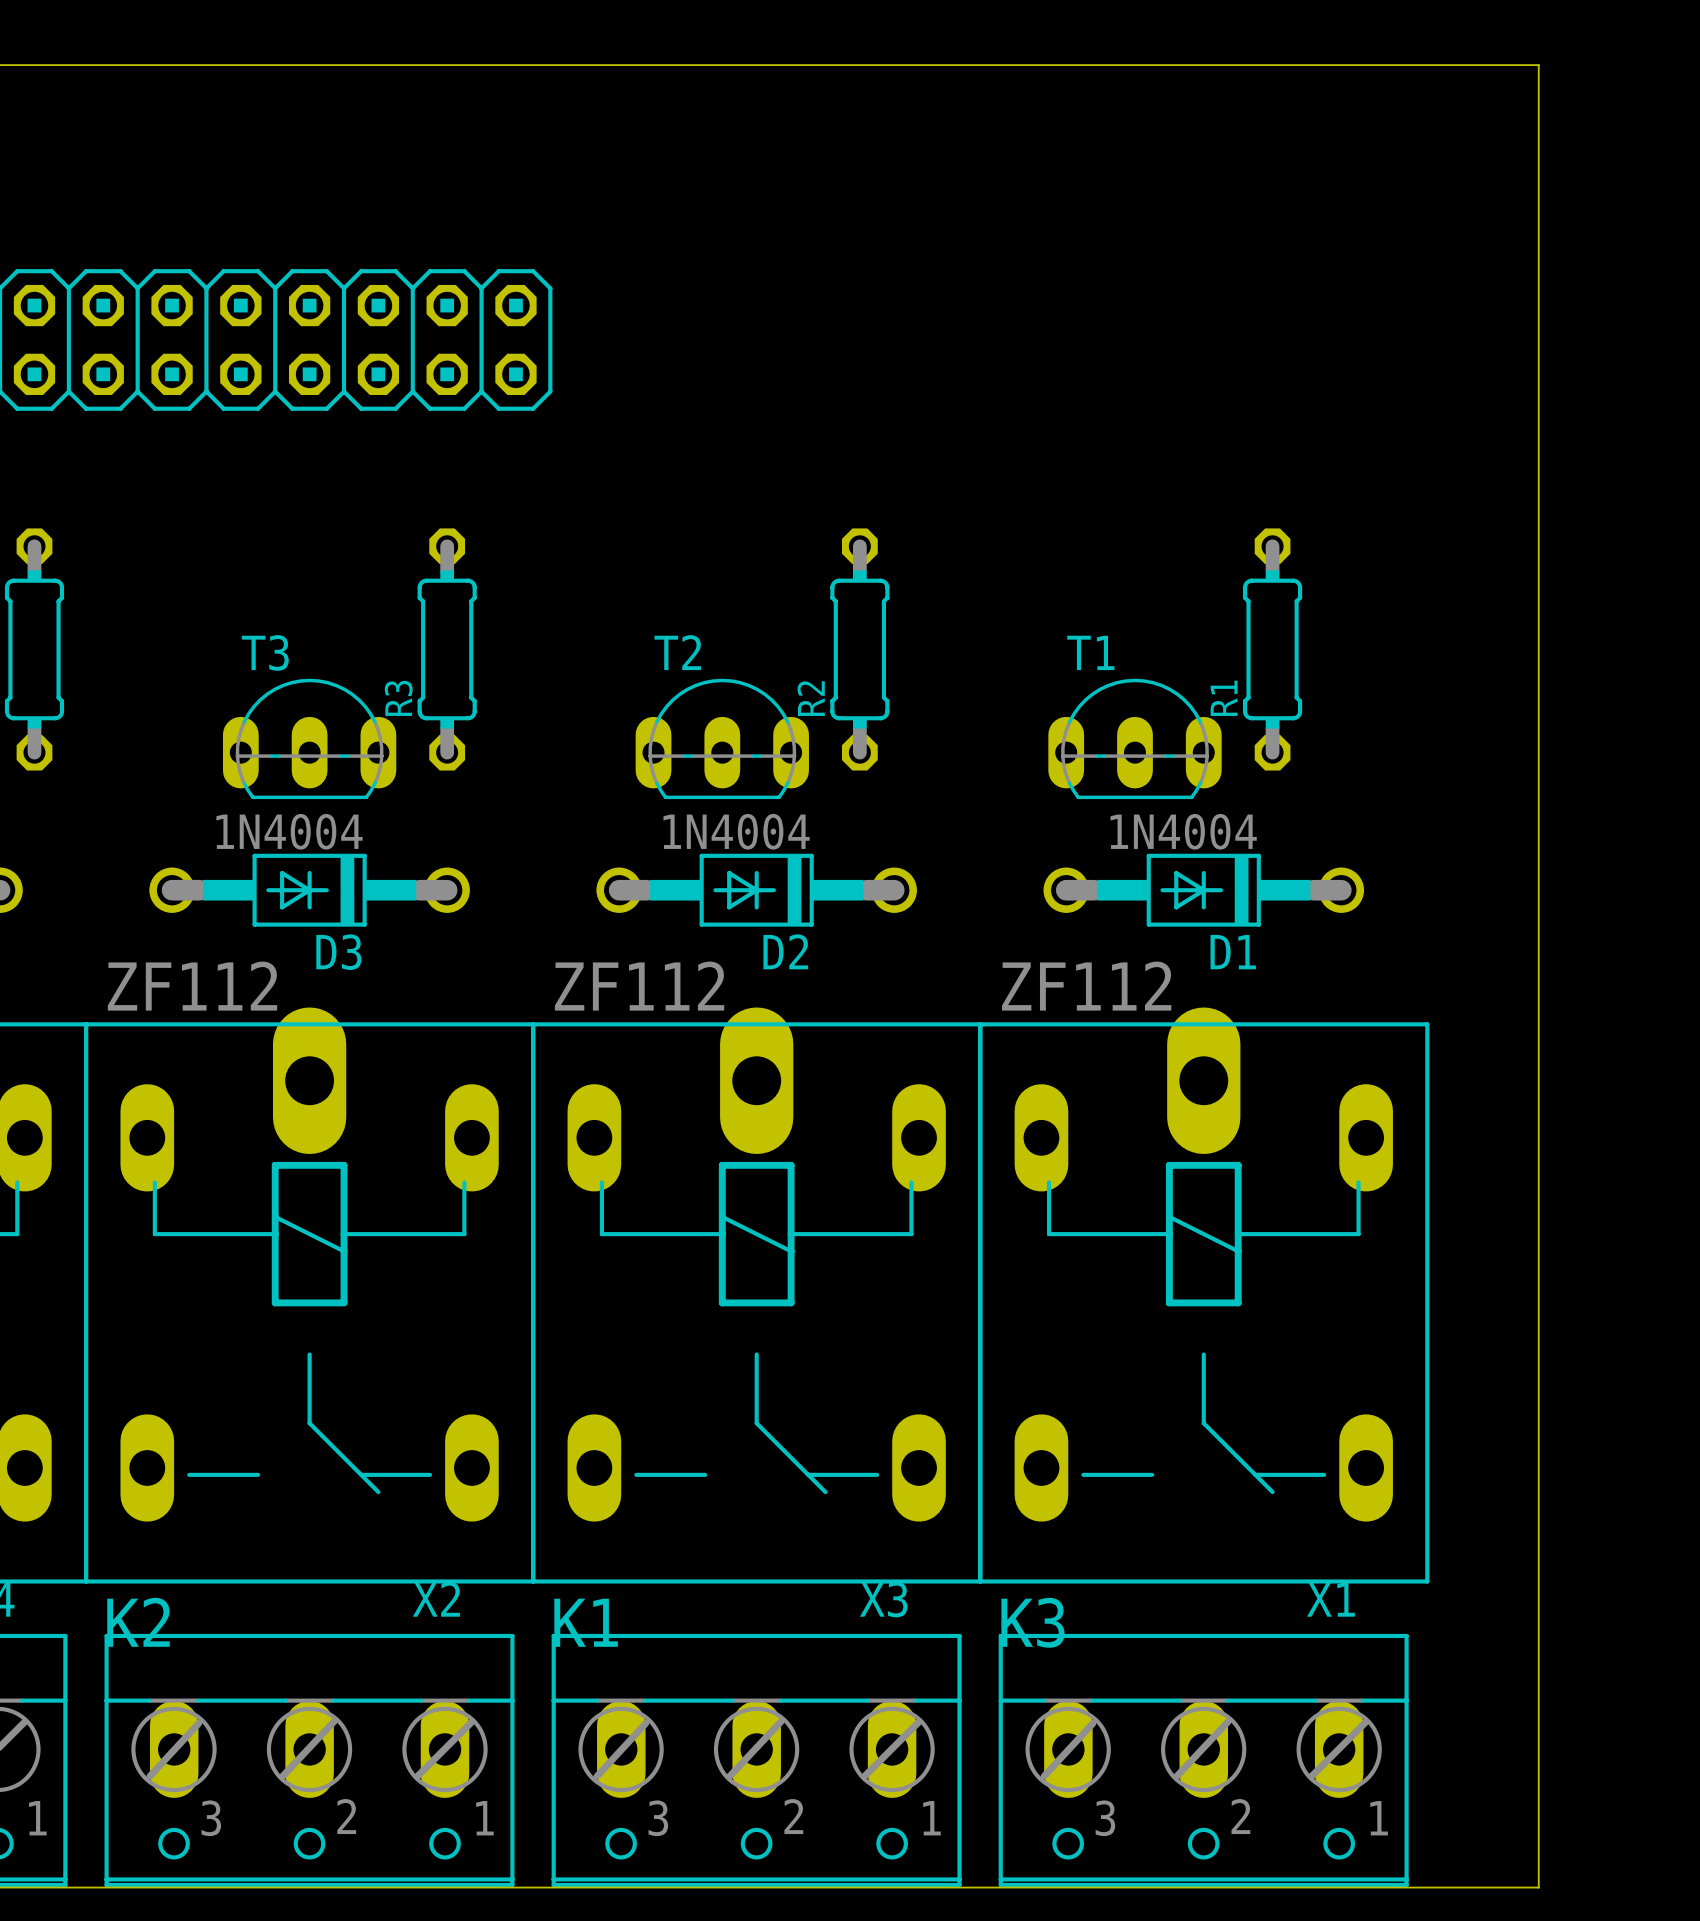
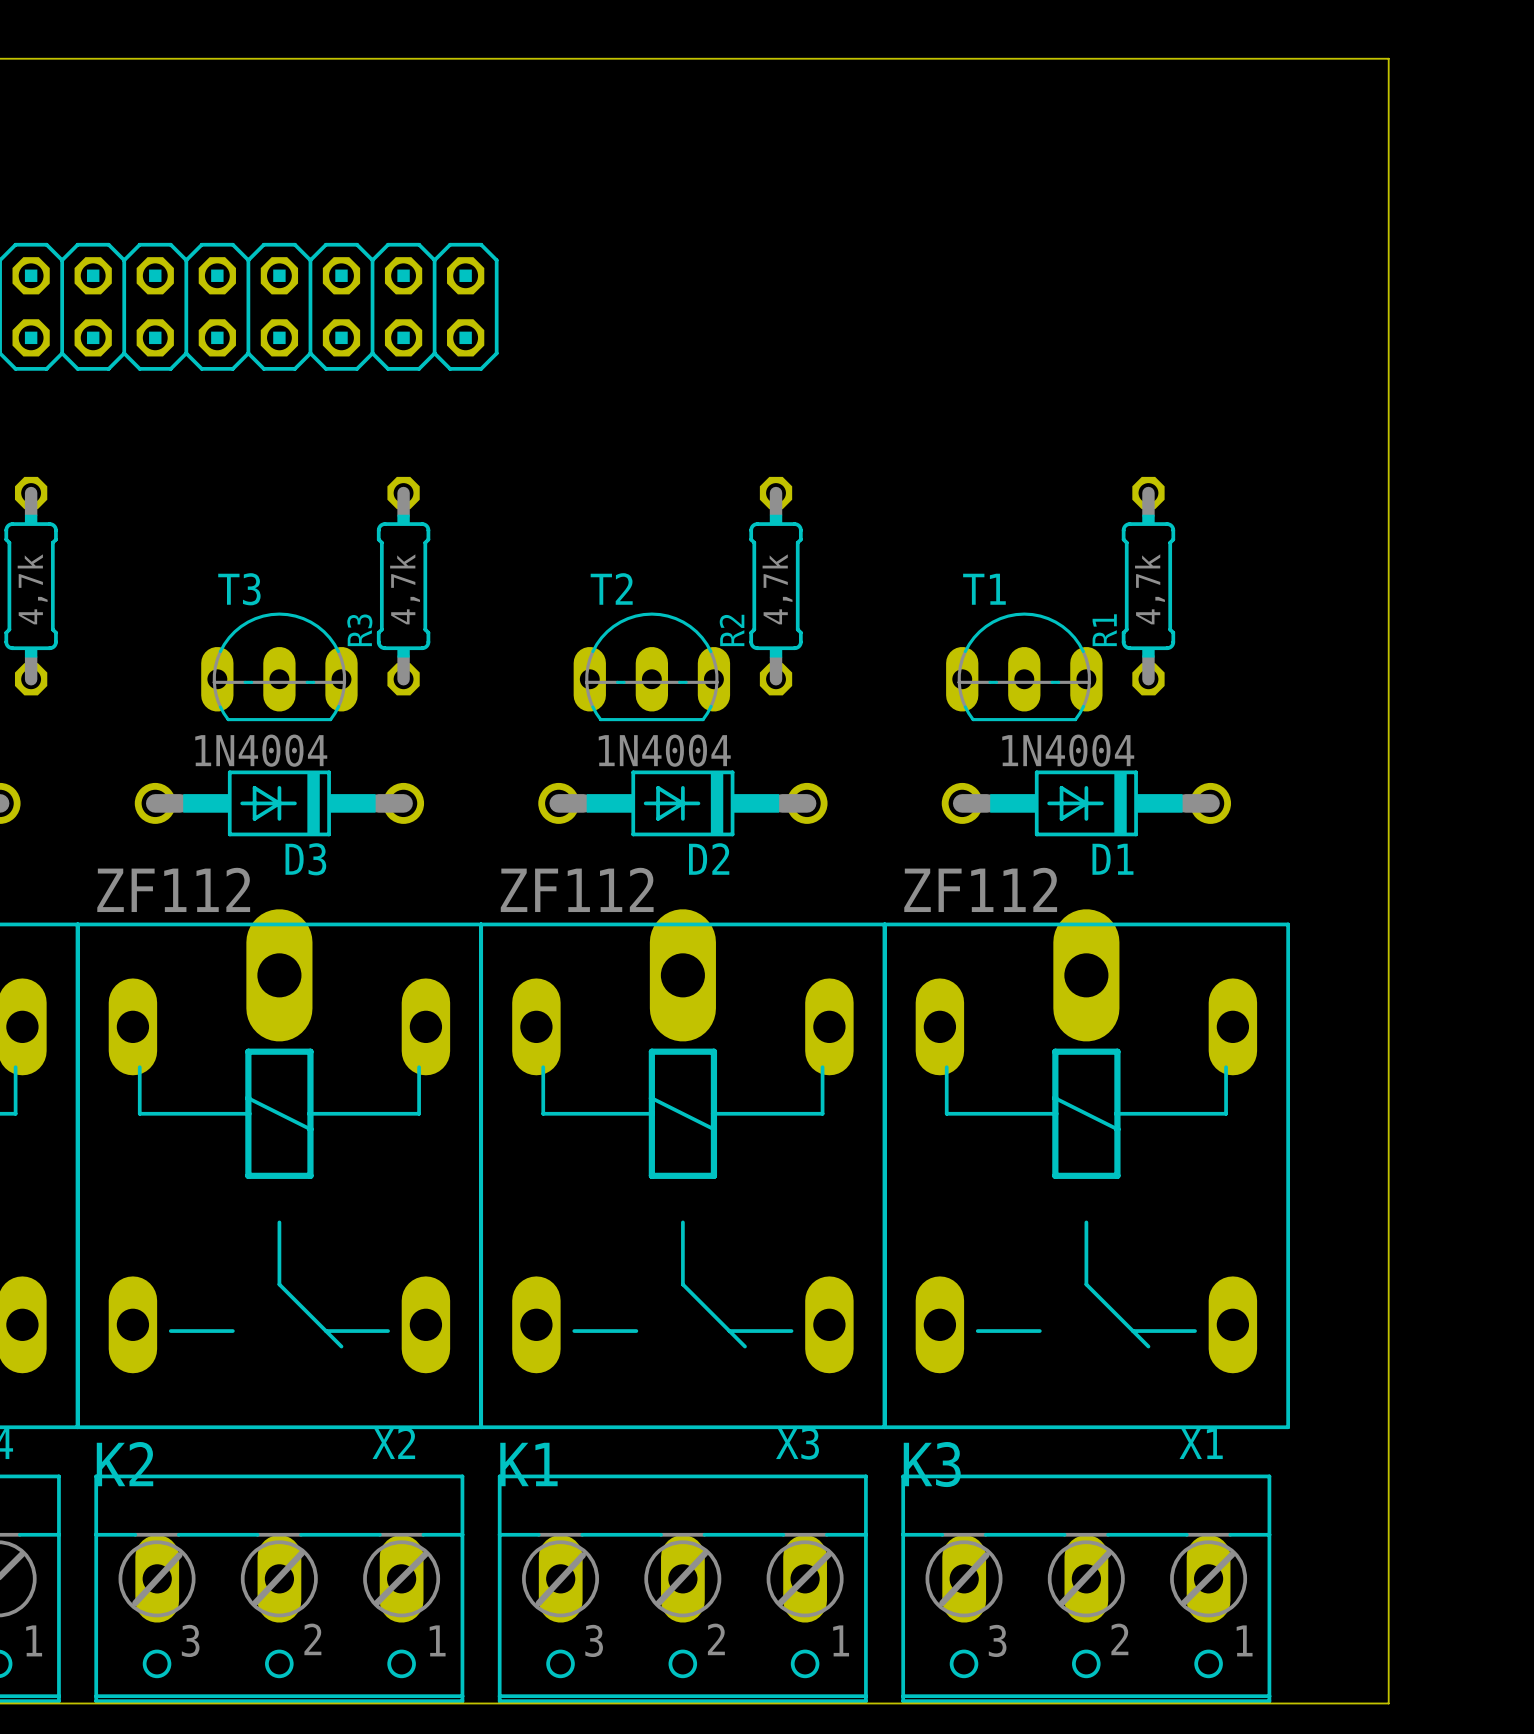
part value: none -> 4,7k (32, 589)
R3 value: none -> 4,7k (405, 589)
R2 value: none -> 4,7k (777, 589)
R1 value: none -> 4,7k (1149, 589)

